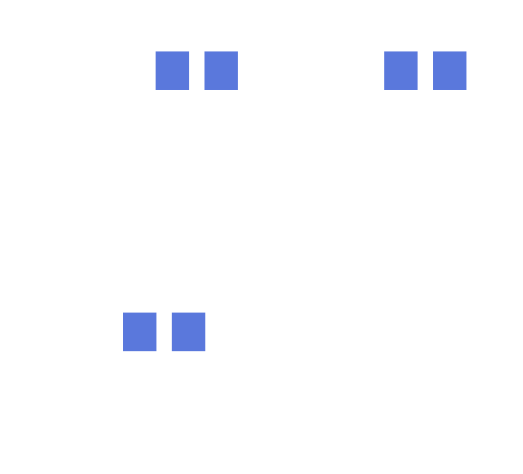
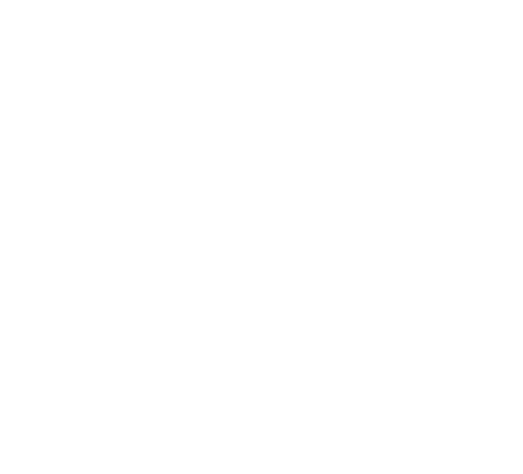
part: (196, 70) -> none
part: (425, 70) -> none
part: (164, 331) -> none

